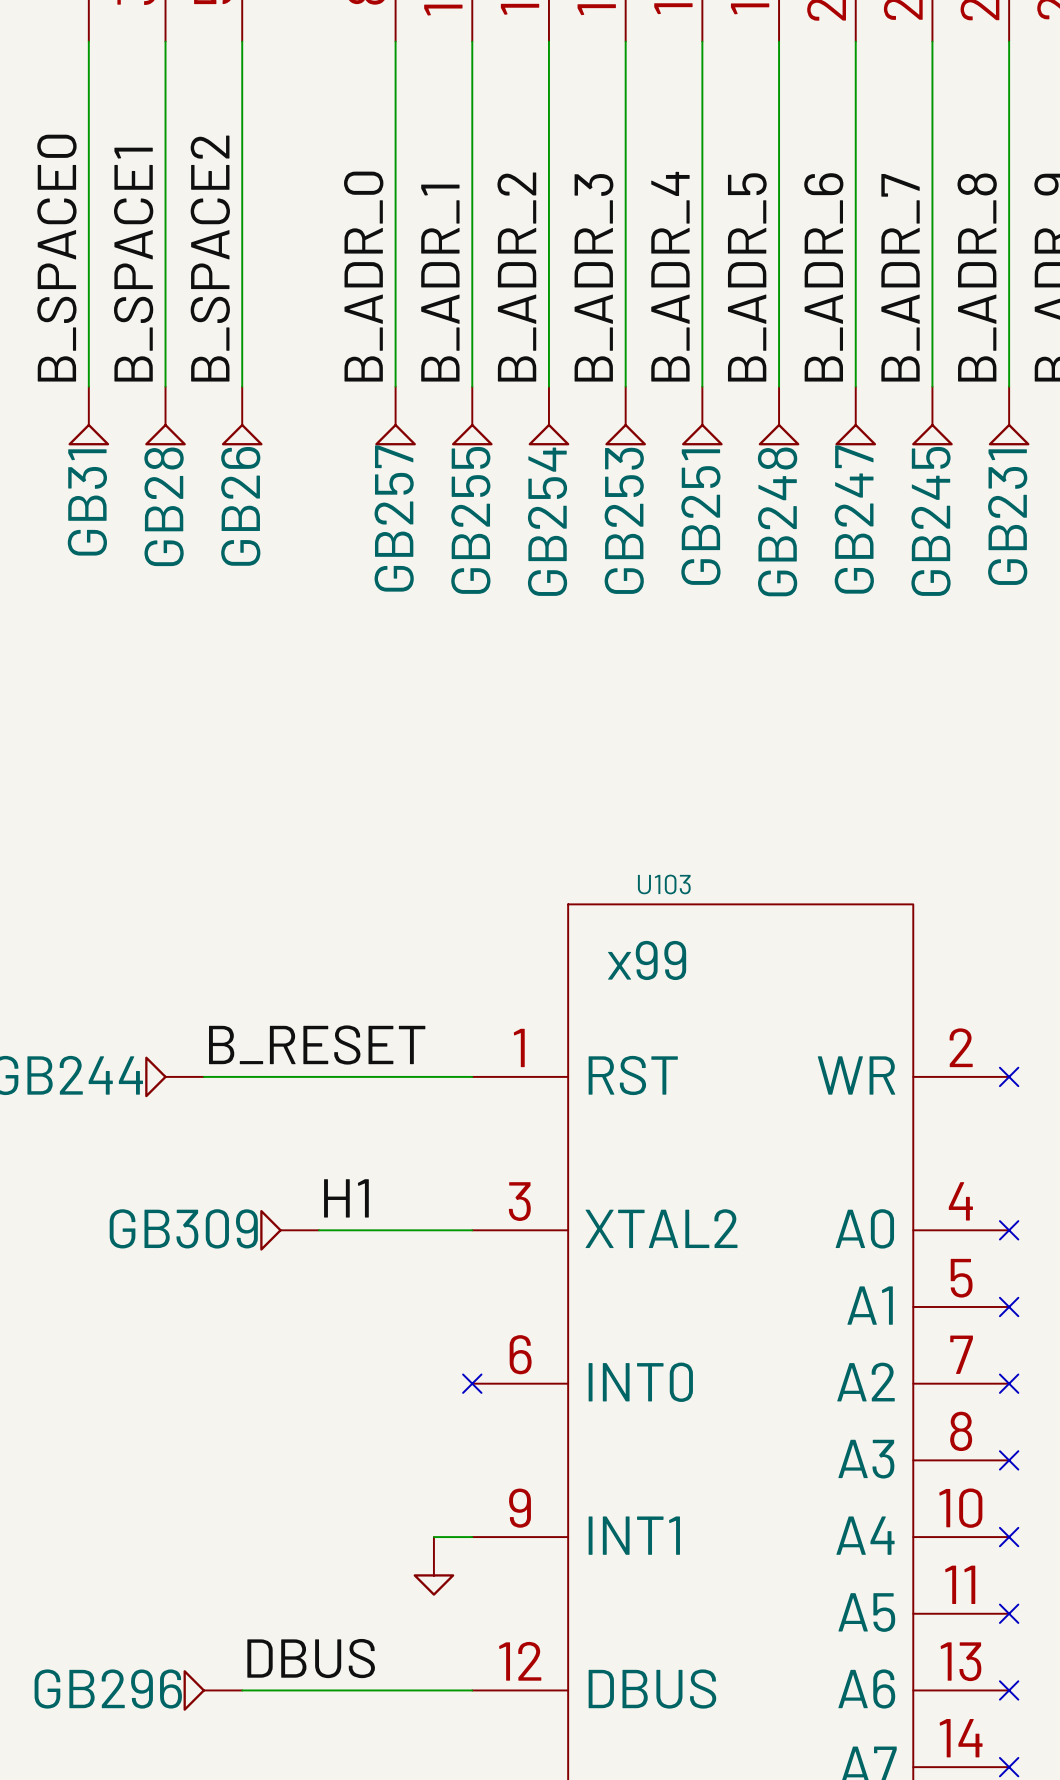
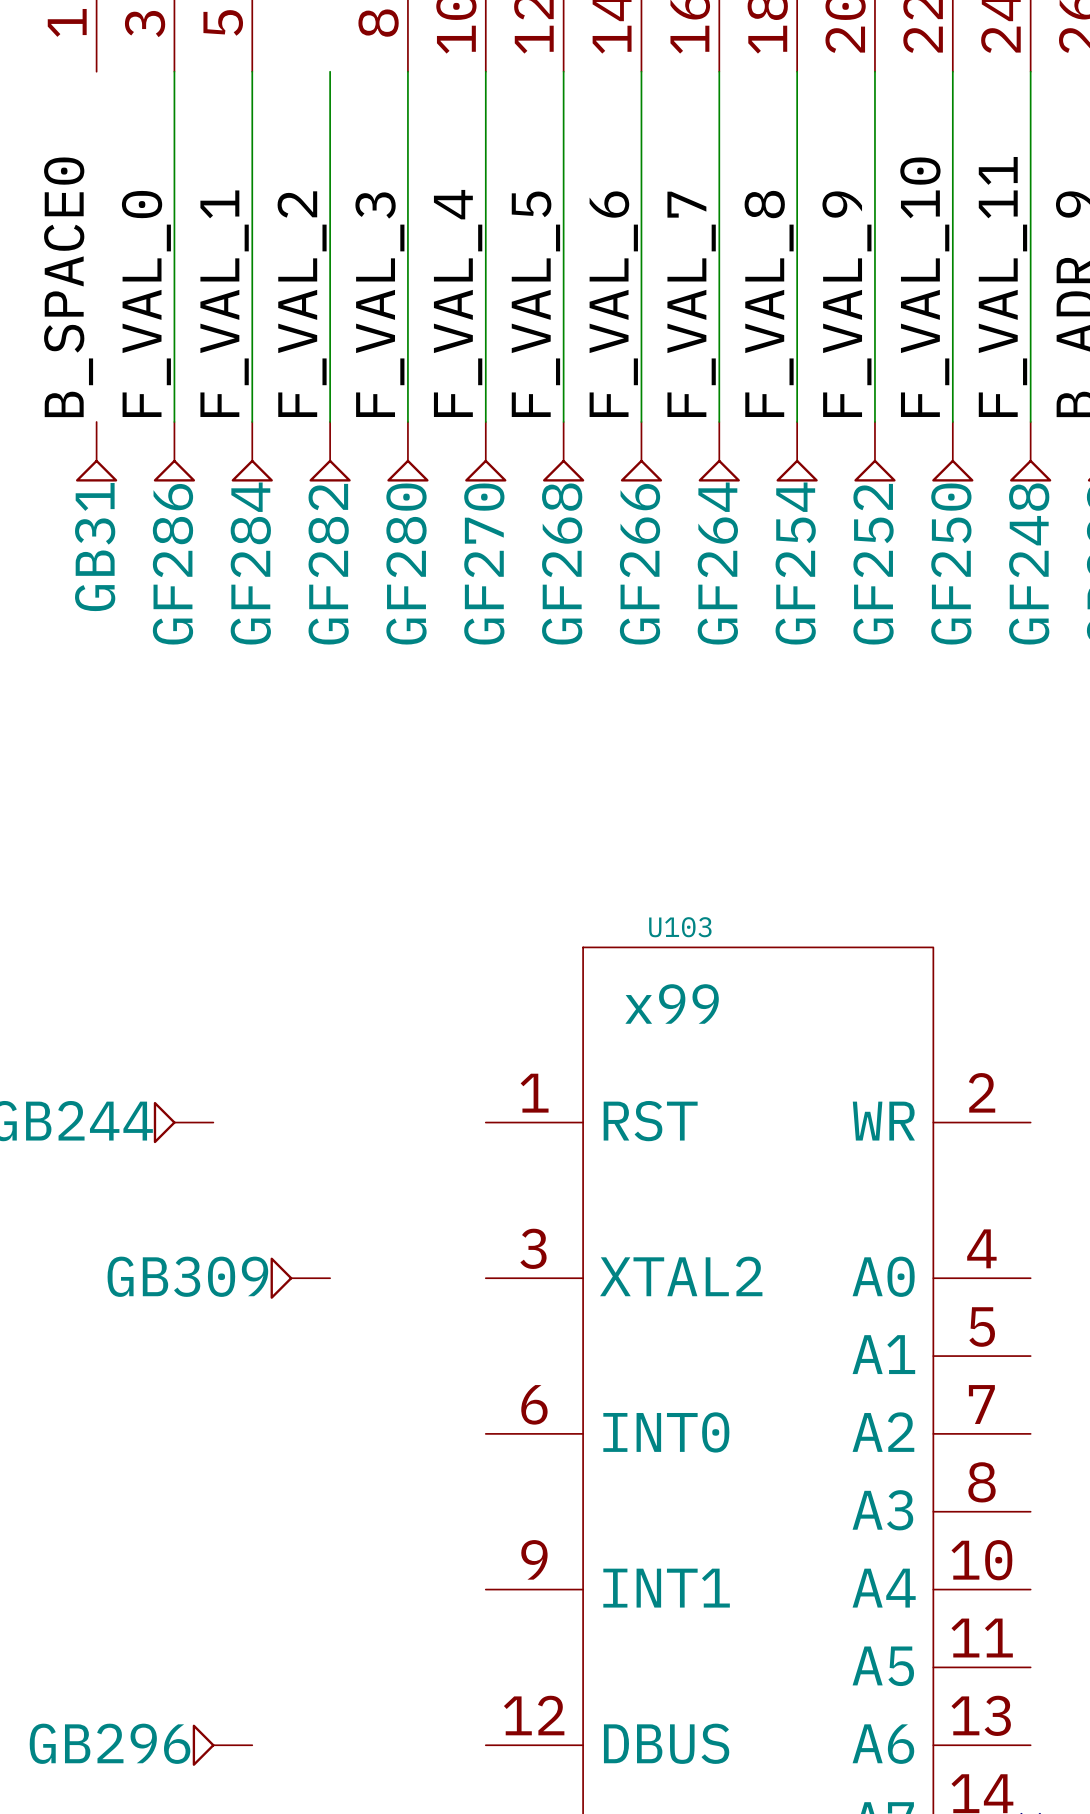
wire: (88, 41) (88, 386) -> (330, 71) (330, 422)
label: B_SPACE2 (210, 258) -> F_VAL_1 (224, 303)
label: B_SPACE1 (133, 264) -> F_VAL_0 (146, 303)
label: B_ADR_0 (363, 276) -> F_VAL_3 (379, 304)
label: B_ADR_4 (670, 276) -> F_VAL_7 (691, 304)
label: B_ADR_2 (516, 277) -> F_VAL_5 (535, 304)
label: B_ADR_3 (593, 277) -> F_VAL_6 (613, 304)
label: B_ADR_5 (747, 277) -> F_VAL_8 (769, 303)
label: B_ADR_6 (823, 277) -> F_VAL_9 (846, 304)
label: B_ADR_7 (900, 277) -> F_VAL_10 (924, 287)
label: B_ADR_8 (977, 277) -> F_VAL_11 (1002, 286)
label: none -> F_VAL_2 (302, 304)
label: B_ADR_1 (440, 283) -> F_VAL_4 (458, 303)
GF282: none -> (330, 451)
GB28 name: GB28 (164, 506) -> GF286 (172, 564)
GB26 name: GB26 (240, 506) -> GF284 (250, 563)
GB251 name: GB251 (700, 517) -> GF264 (717, 563)
GB231 name: GB231 (1007, 517) -> GF248 (1029, 563)
GB257 name: GB257 (394, 518) -> GF280 (406, 564)
GB247 name: GB247 (854, 519) -> GF252 (873, 564)
GB255 name: GB255 (470, 520) -> GF270 (484, 564)
GB253 name: GB253 (624, 520) -> GF266 (640, 564)
GB254 name: GB254 (547, 521) -> GF268 (562, 563)
GB248 name: GB248 (777, 521) -> GF254 (795, 563)
GB245 name: GB245 (931, 521) -> GF250 (951, 564)
label: B_RESET (317, 1045) -> none
wire: (203, 1076) (472, 1076) -> none
no-connect mark: (1009, 1076) -> none
label: H1 (346, 1198) -> none
wire: (318, 1230) (472, 1230) -> none
no-connect mark: (1009, 1230) -> none
no-connect mark: (1009, 1306) -> none
no-connect mark: (472, 1383) -> none
no-connect mark: (1009, 1383) -> none
no-connect mark: (1009, 1460) -> none
wire: (433, 1537) (472, 1537) -> none
no-connect mark: (1009, 1537) -> none
power symbol: (433, 1566) -> none
no-connect mark: (1009, 1613) -> none
label: DBUS (311, 1658) -> none
wire: (242, 1690) (472, 1690) -> none
no-connect mark: (1009, 1690) -> none

